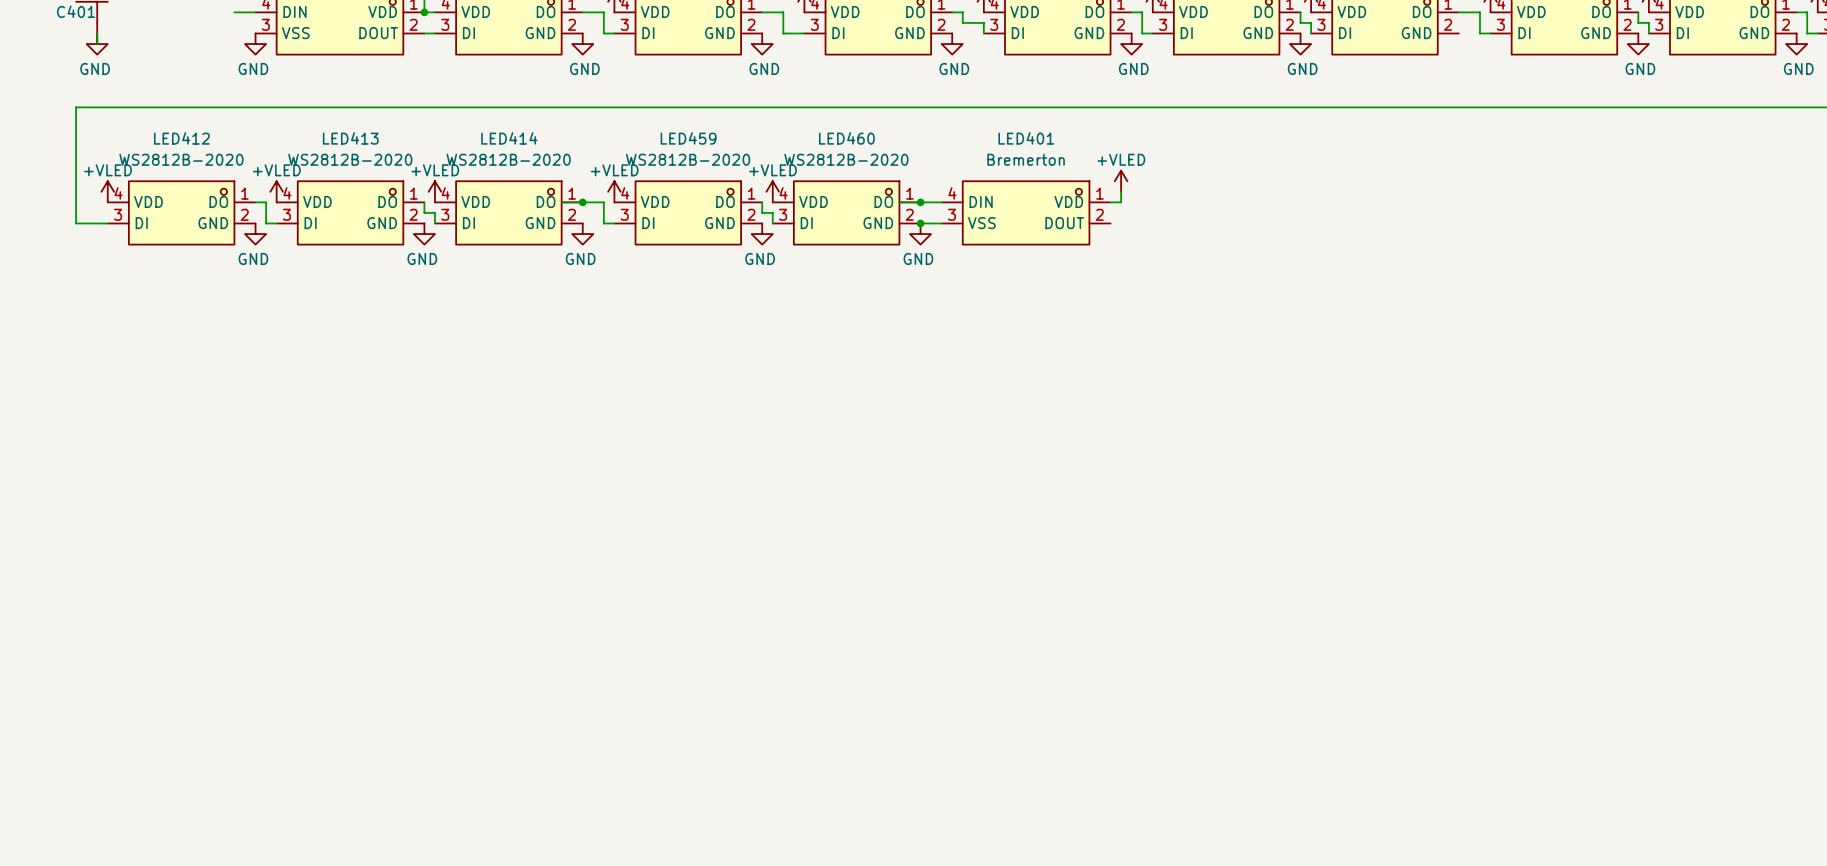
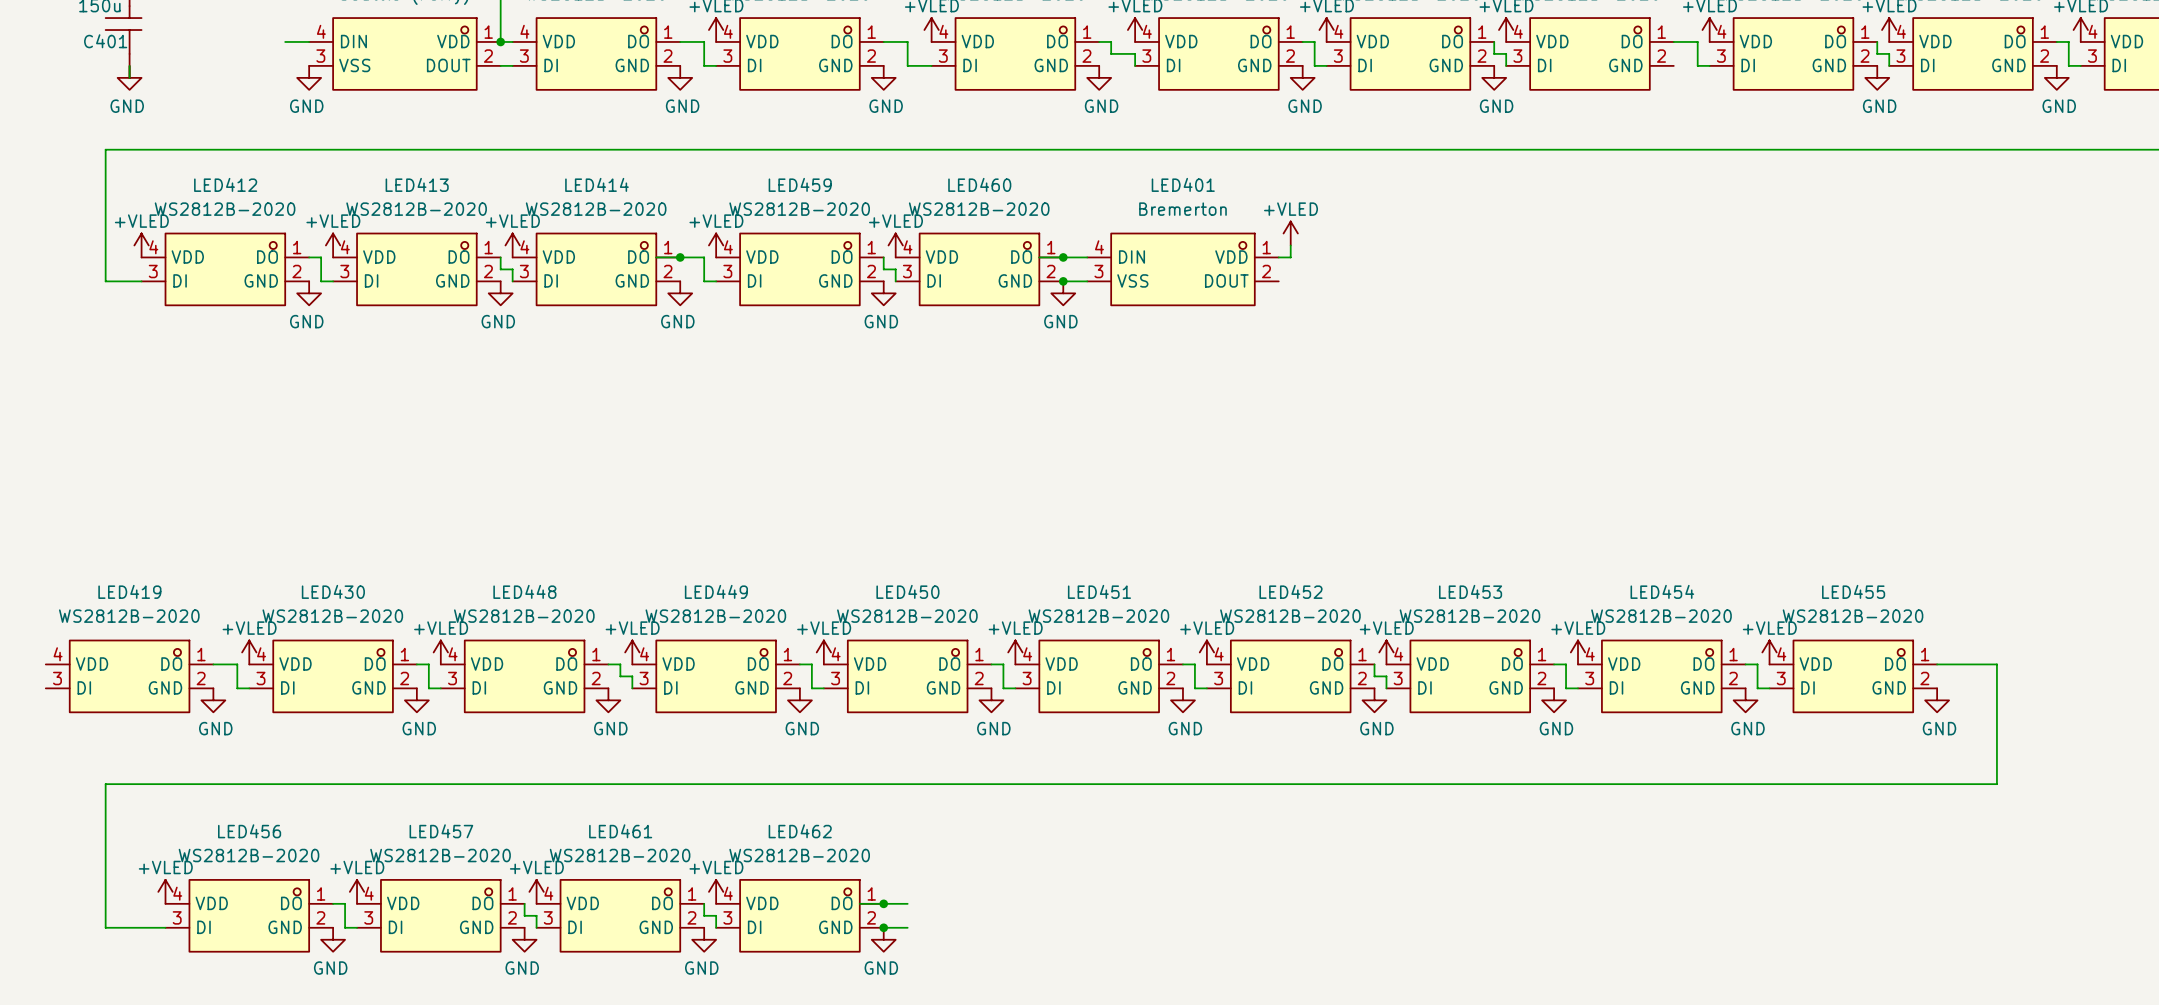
power symbol: none -> +VLED (249, 652)
power symbol: none -> +VLED (440, 652)
power symbol: none -> +VLED (632, 652)
power symbol: none -> +VLED (823, 652)
power symbol: none -> +VLED (1015, 652)
power symbol: none -> +VLED (1206, 652)
power symbol: none -> +VLED (1386, 652)
power symbol: none -> +VLED (1578, 652)
power symbol: none -> +VLED (1769, 652)
wire: none -> (213, 664) (237, 664) (237, 688) (249, 688)
wire: none -> (416, 664) (428, 664) (428, 688) (440, 688)
wire: none -> (608, 664) (620, 664) (620, 676) (632, 676) (632, 688)
wire: none -> (799, 664) (811, 664) (811, 688) (823, 688)
wire: none -> (991, 664) (1003, 664) (1003, 688) (1015, 688)
wire: none -> (1182, 664) (1194, 664) (1194, 688) (1206, 688)
wire: none -> (1374, 664) (1374, 676) (1386, 676) (1386, 688)
wire: none -> (1554, 664) (1566, 664) (1566, 688) (1578, 688)
wire: none -> (1745, 664) (1757, 664) (1757, 688) (1769, 688)
wire: none -> (1937, 664) (1996, 664) (1996, 784) (105, 784) (105, 927) (165, 927)
LED419: none -> WS2812B-2020 (129, 676)
LED430: none -> WS2812B-2020 (333, 676)
LED448: none -> WS2812B-2020 (524, 676)
LED449: none -> WS2812B-2020 (716, 676)
LED450: none -> WS2812B-2020 (907, 676)
LED451: none -> WS2812B-2020 (1099, 676)
LED452: none -> WS2812B-2020 (1290, 676)
LED453: none -> WS2812B-2020 (1470, 676)
LED454: none -> WS2812B-2020 (1661, 676)
LED455: none -> WS2812B-2020 (1853, 676)
power symbol: none -> GND (213, 700)
power symbol: none -> GND (416, 700)
power symbol: none -> GND (608, 700)
power symbol: none -> GND (799, 700)
power symbol: none -> GND (991, 700)
power symbol: none -> GND (1182, 700)
power symbol: none -> GND (1374, 700)
power symbol: none -> GND (1554, 700)
power symbol: none -> GND (1745, 700)
power symbol: none -> GND (1937, 700)
power symbol: none -> +VLED (165, 891)
power symbol: none -> +VLED (357, 891)
power symbol: none -> +VLED (536, 891)
power symbol: none -> +VLED (716, 891)
wire: none -> (333, 903) (345, 903) (345, 927) (357, 927)
wire: none -> (524, 903) (524, 915) (536, 915) (536, 927)
wire: none -> (704, 903) (704, 915) (716, 915) (716, 927)
wire: none -> (859, 903) (907, 903)
junction: none -> (883, 903)
LED456: none -> WS2812B-2020 (249, 915)
LED457: none -> WS2812B-2020 (440, 915)
LED461: none -> WS2812B-2020 (620, 915)
LED462: none -> WS2812B-2020 (799, 915)
wire: none -> (883, 927) (907, 927)
junction: none -> (883, 927)
power symbol: none -> GND (333, 939)
power symbol: none -> GND (524, 939)
power symbol: none -> GND (704, 939)
power symbol: none -> GND (883, 939)

